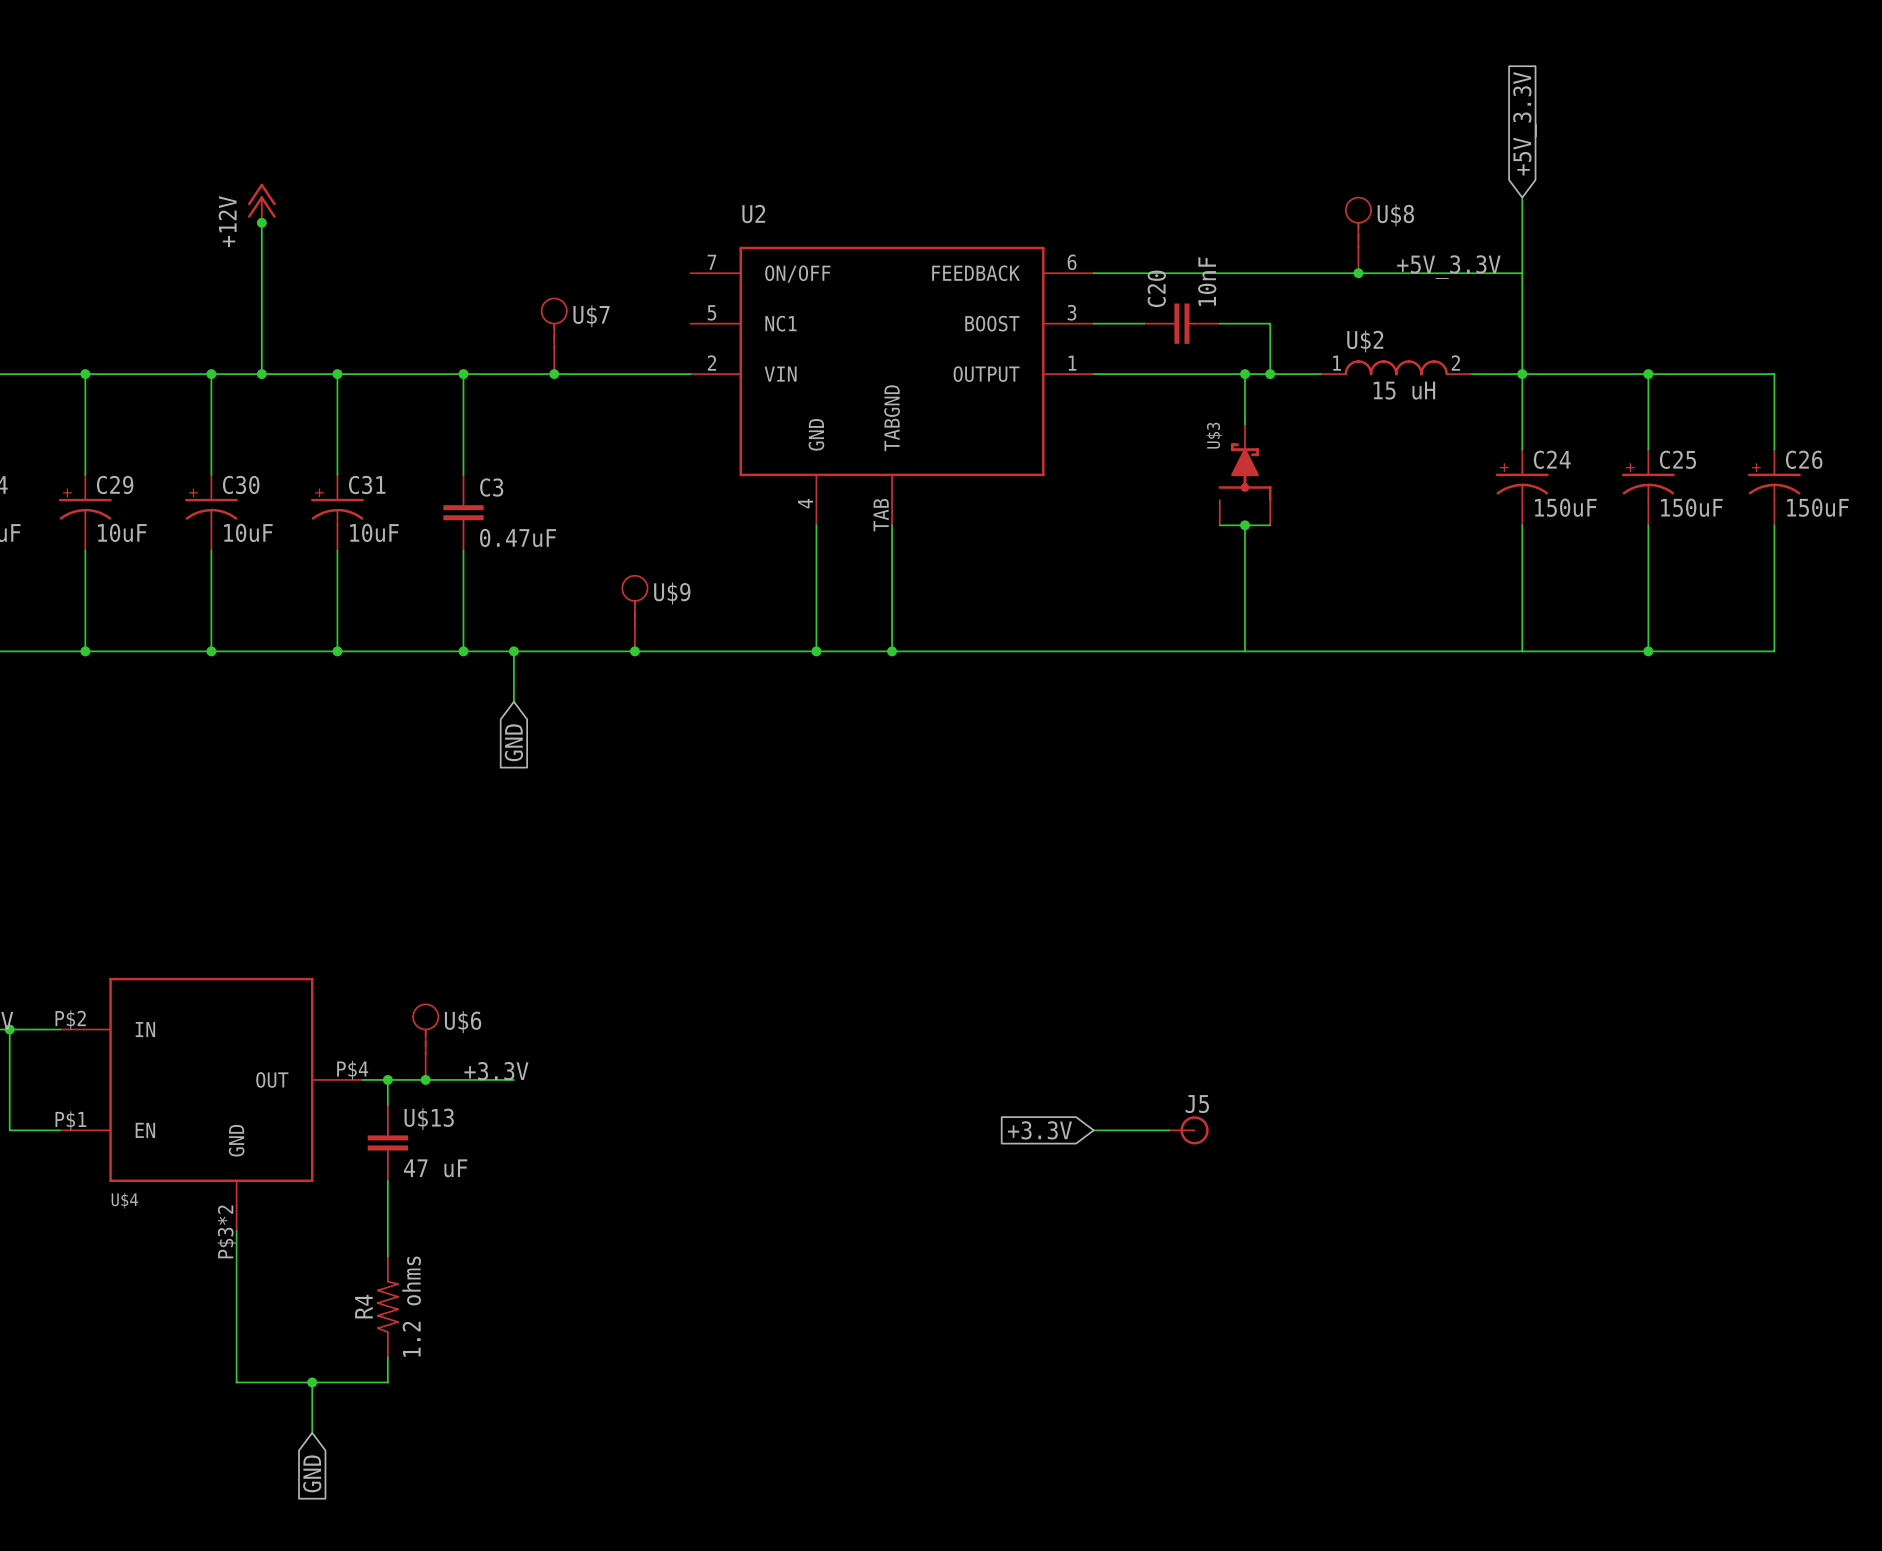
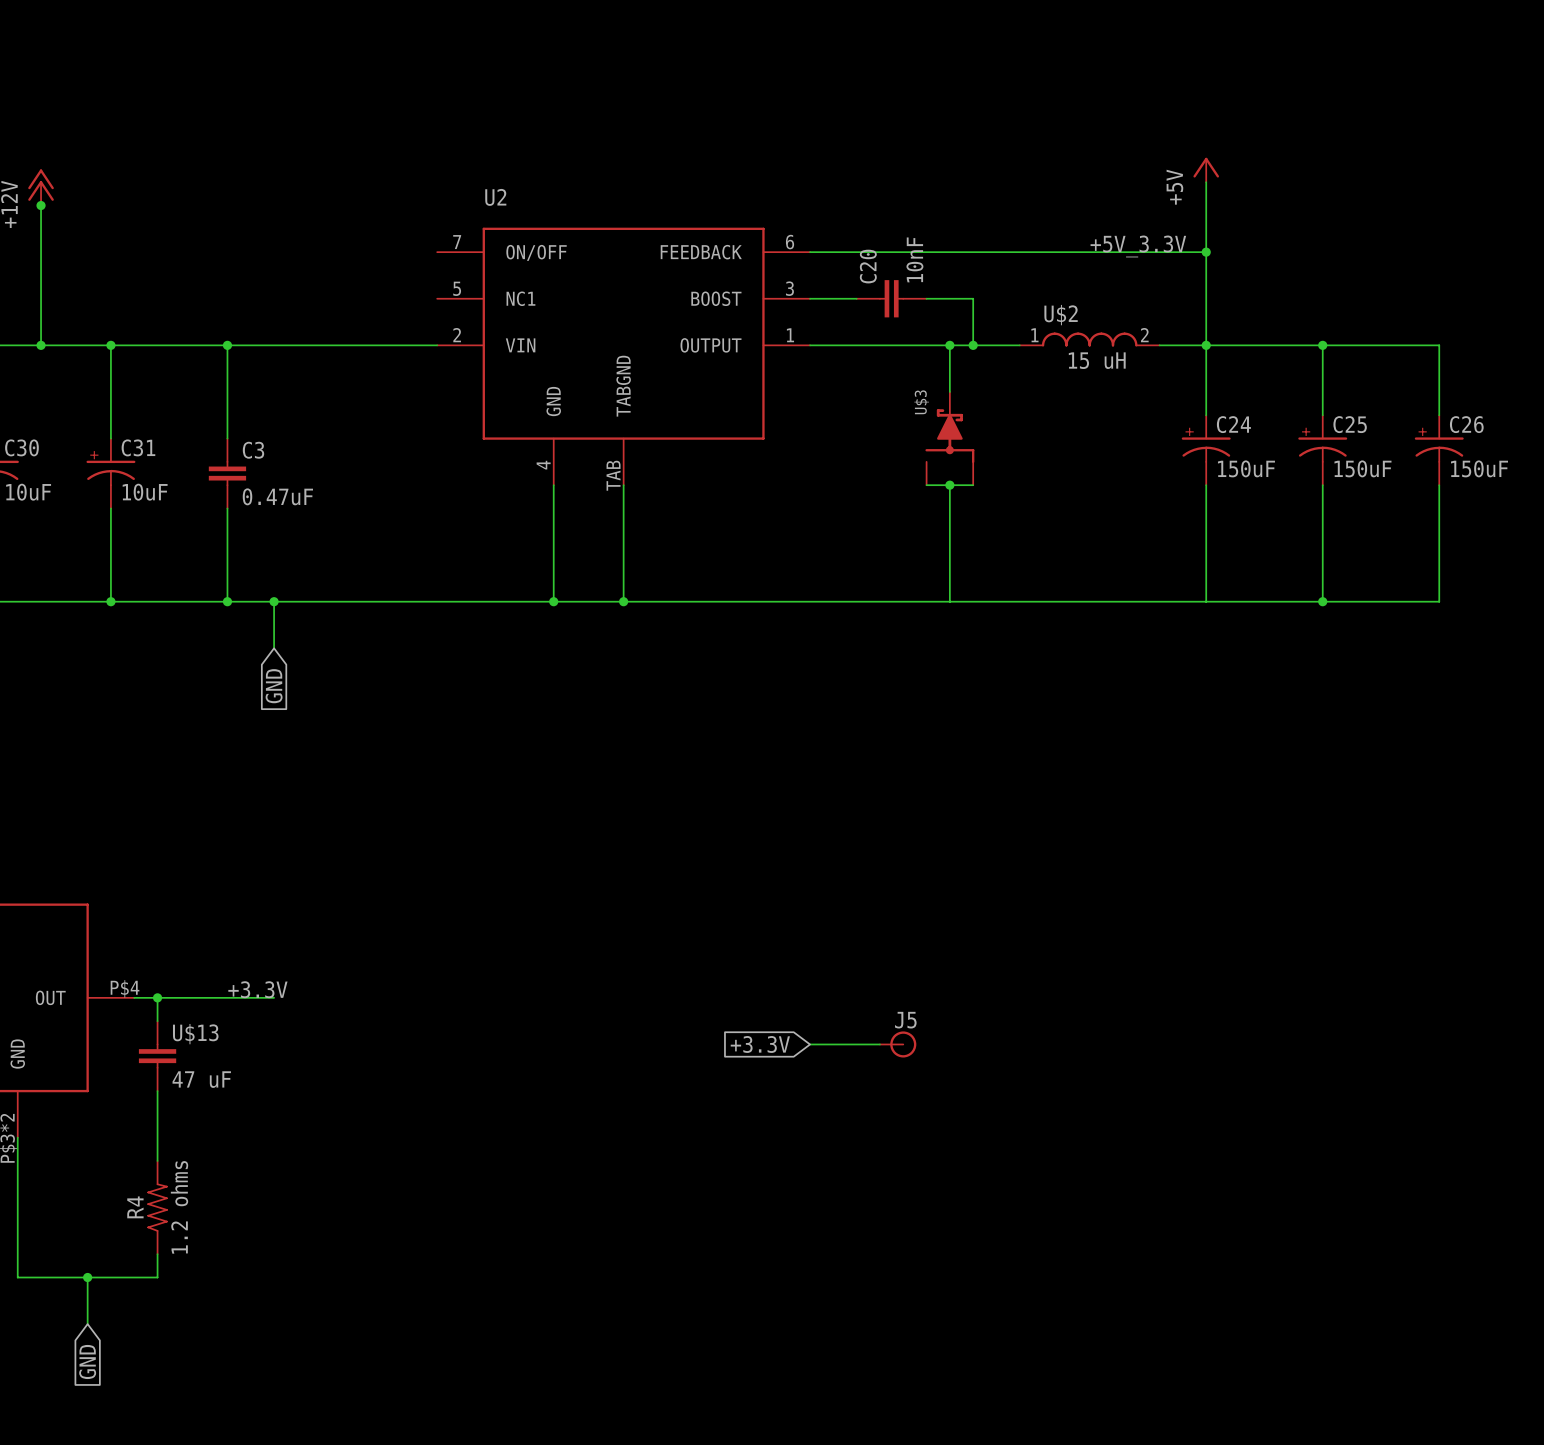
global label: +5V_3.3V (1524, 123) -> none
power symbol: none -> +5V (1206, 170)
U$8: (1358, 235) -> none
junction: (1358, 273) -> none
junction: none -> (1206, 252)
U$7: (554, 335) -> none
junction: (554, 374) -> none
U$9: (634, 613) -> none
junction: (634, 651) -> none
U$6: (425, 1041) -> none
junction: (425, 1079) -> none

